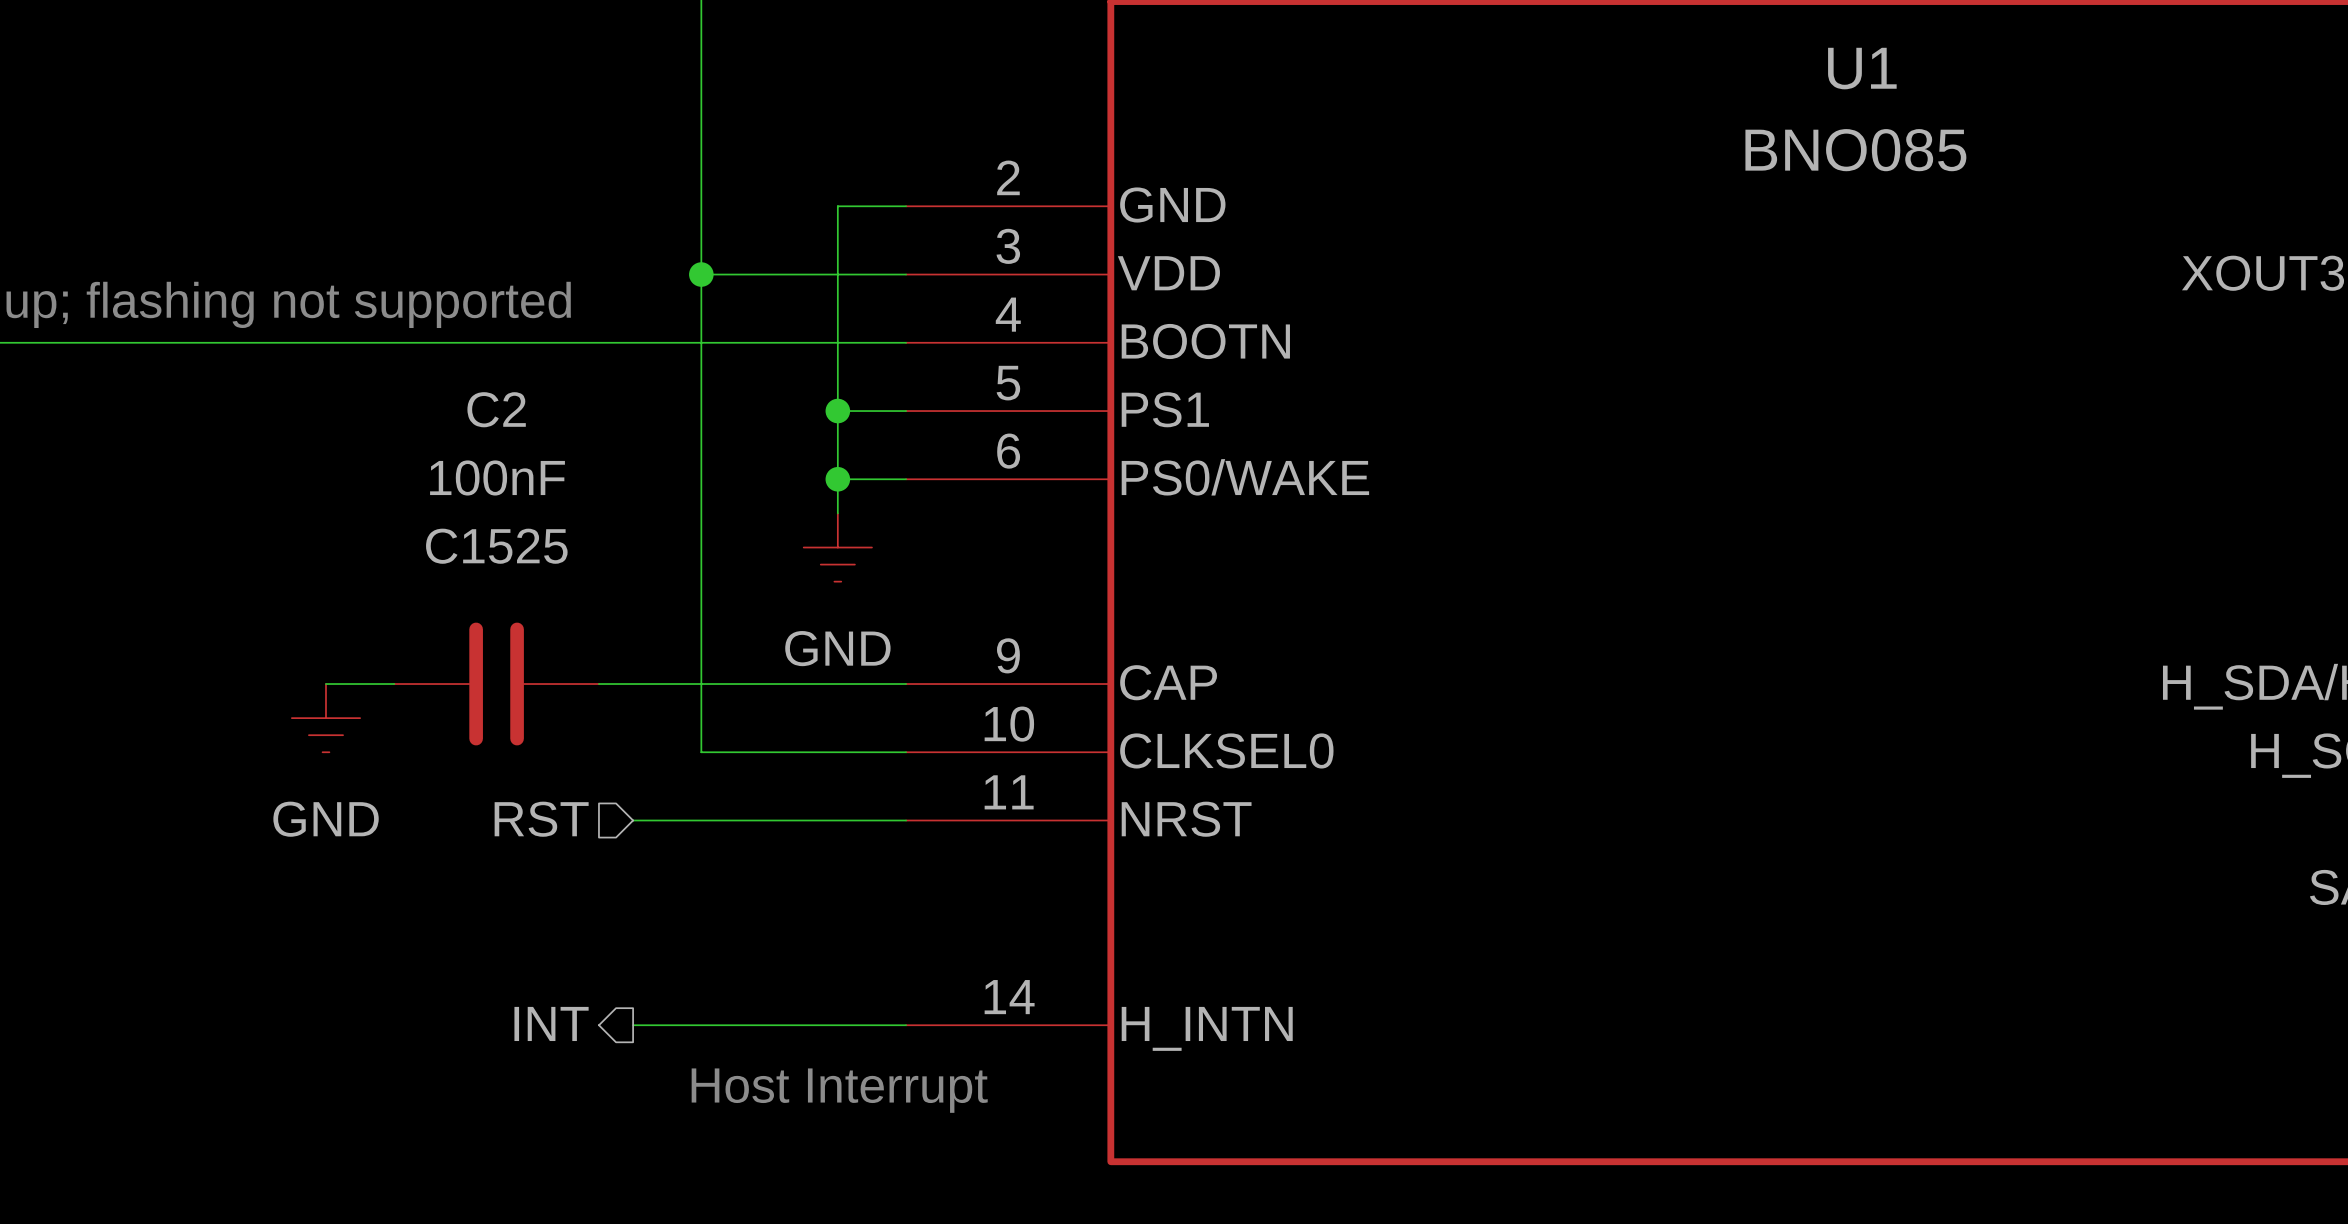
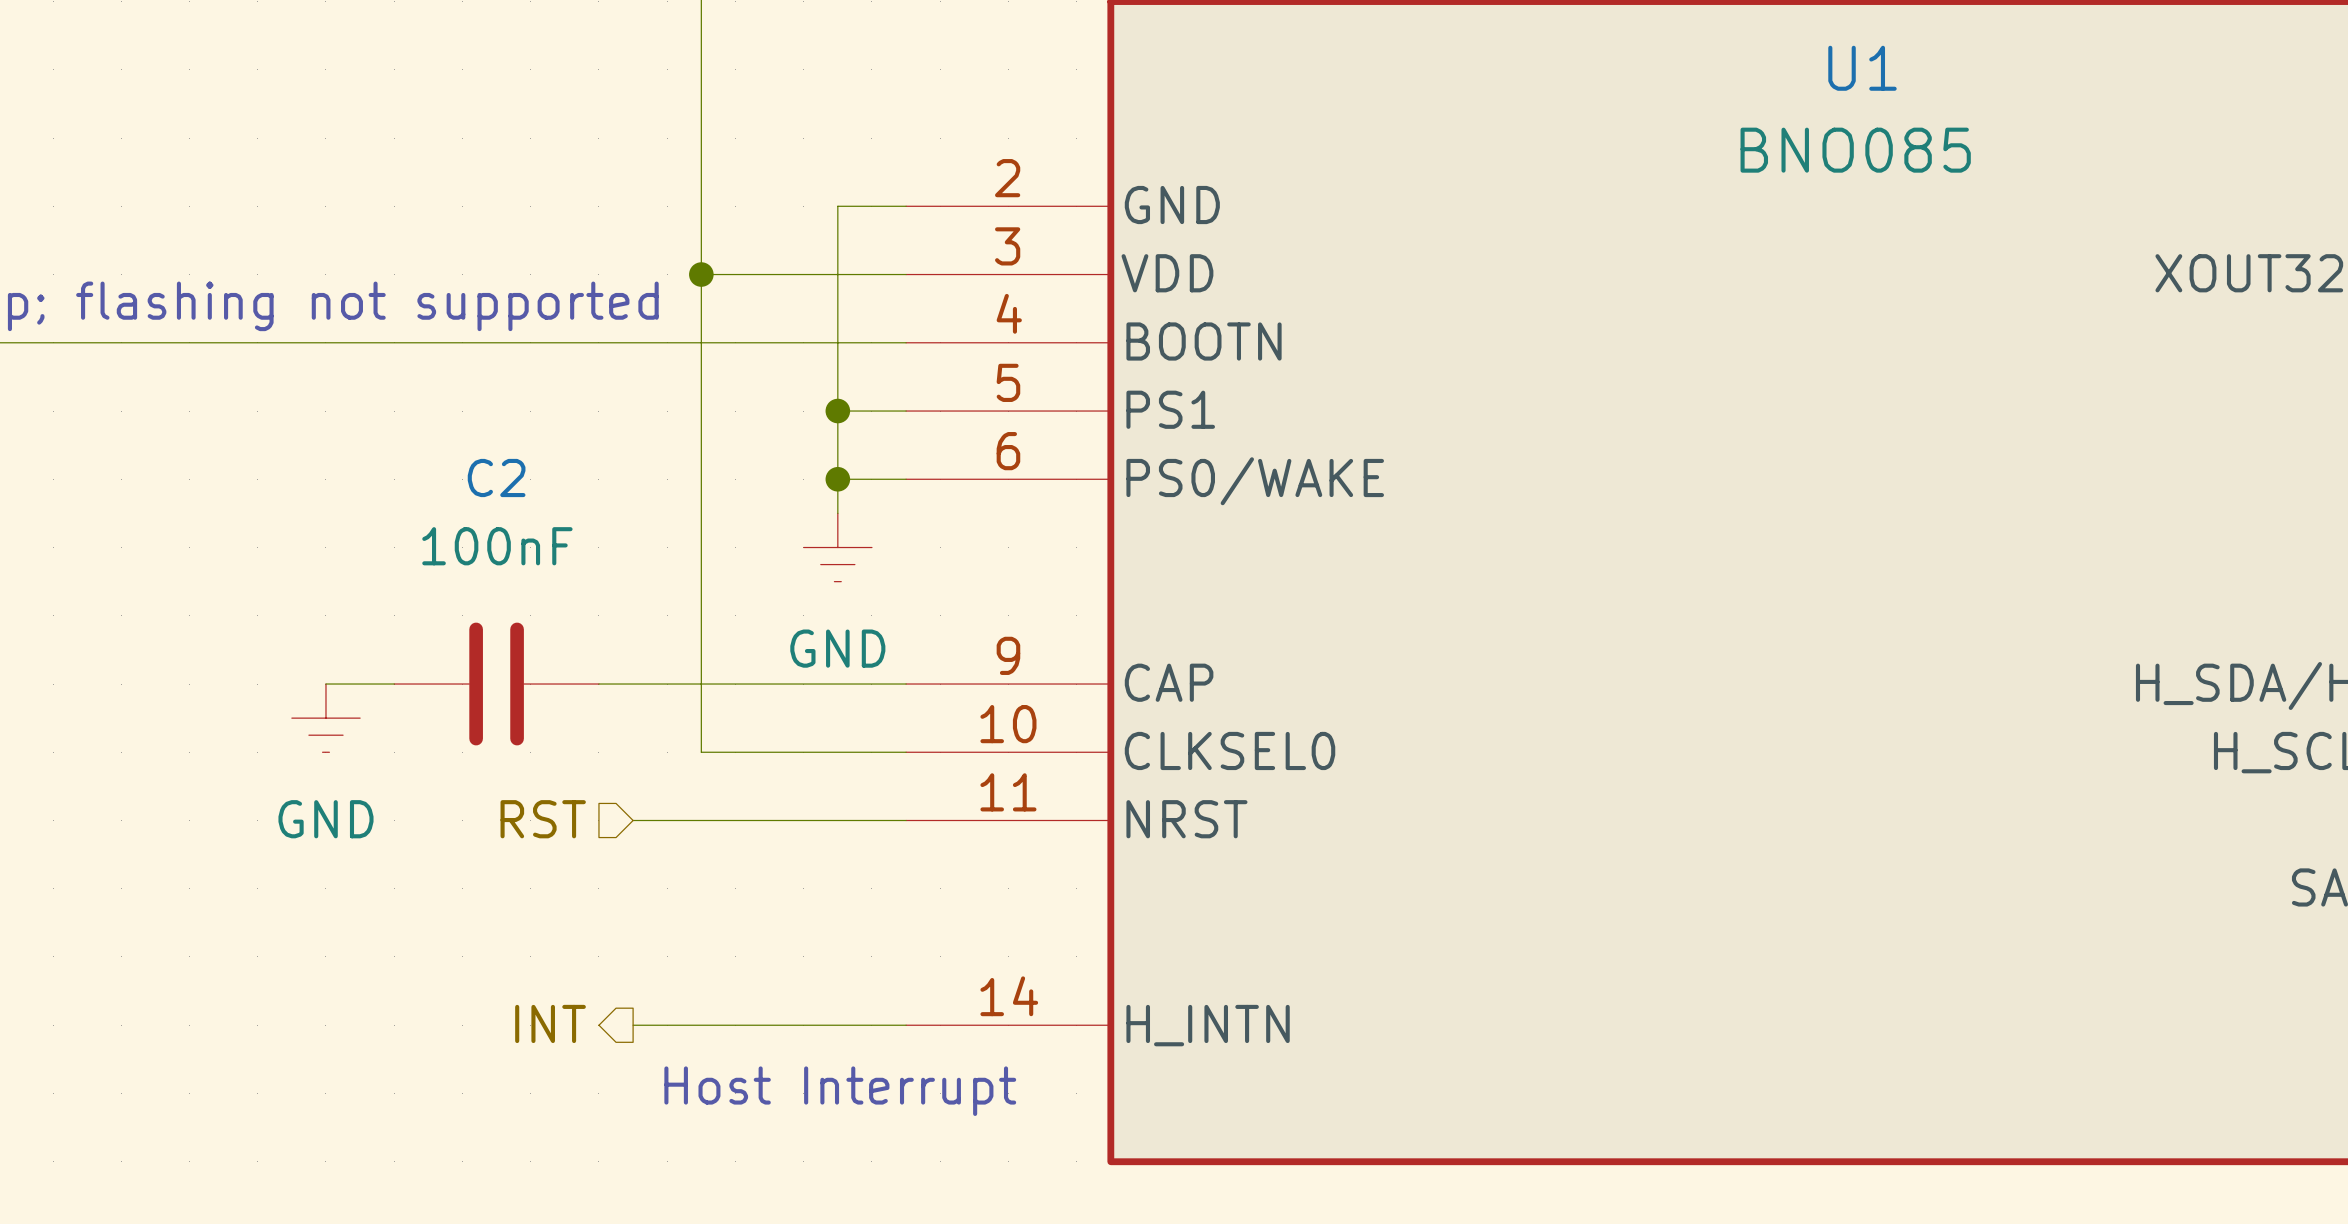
C2 name position: C2 (496, 409) -> C2 (496, 477)
C2 value position: 100nF (497, 477) -> 100nF (497, 546)
C2 text: C1525 (496, 546) -> none

